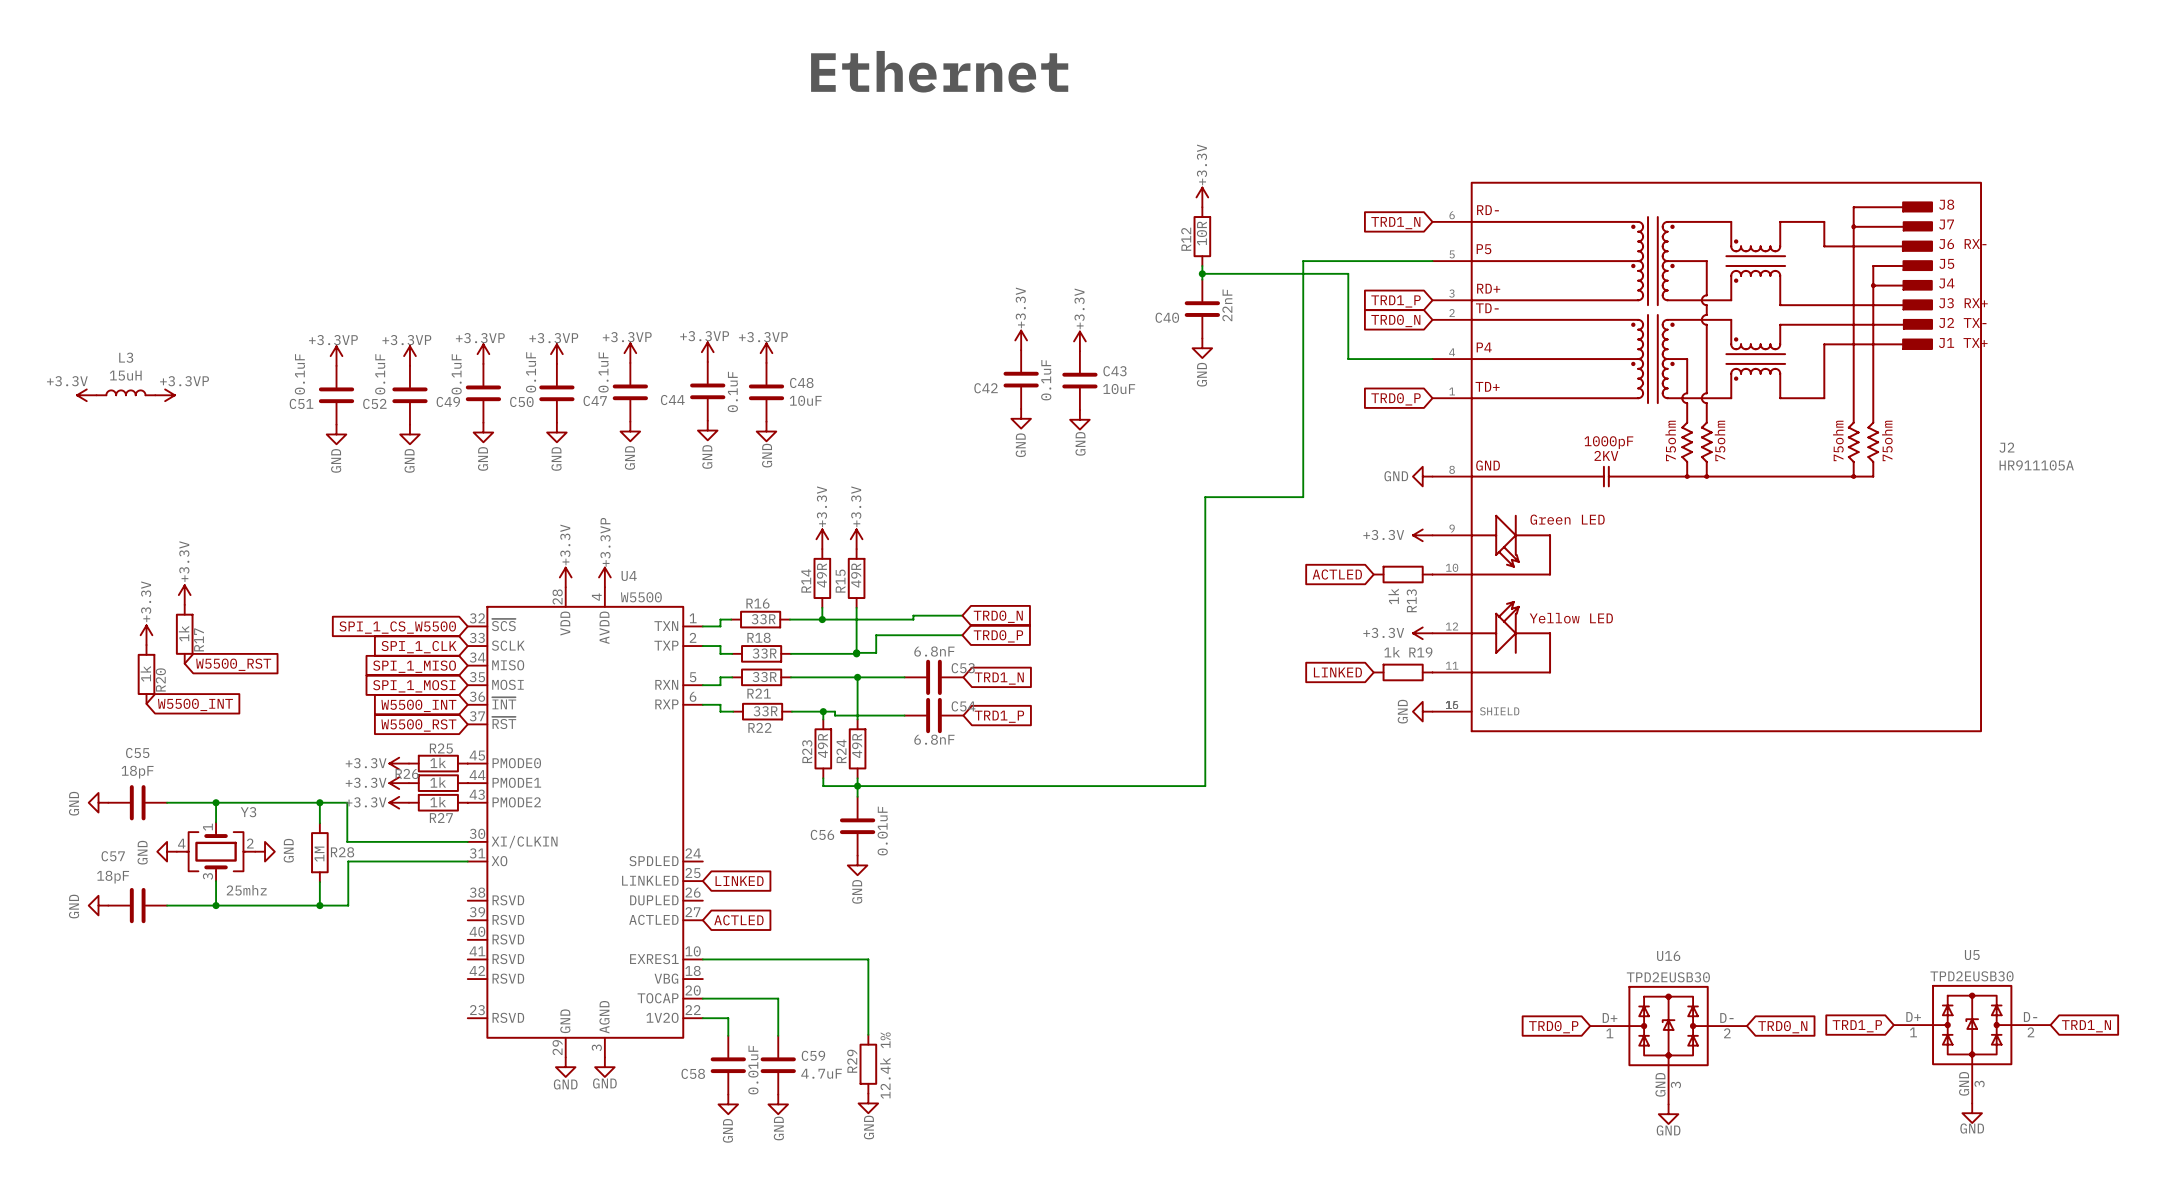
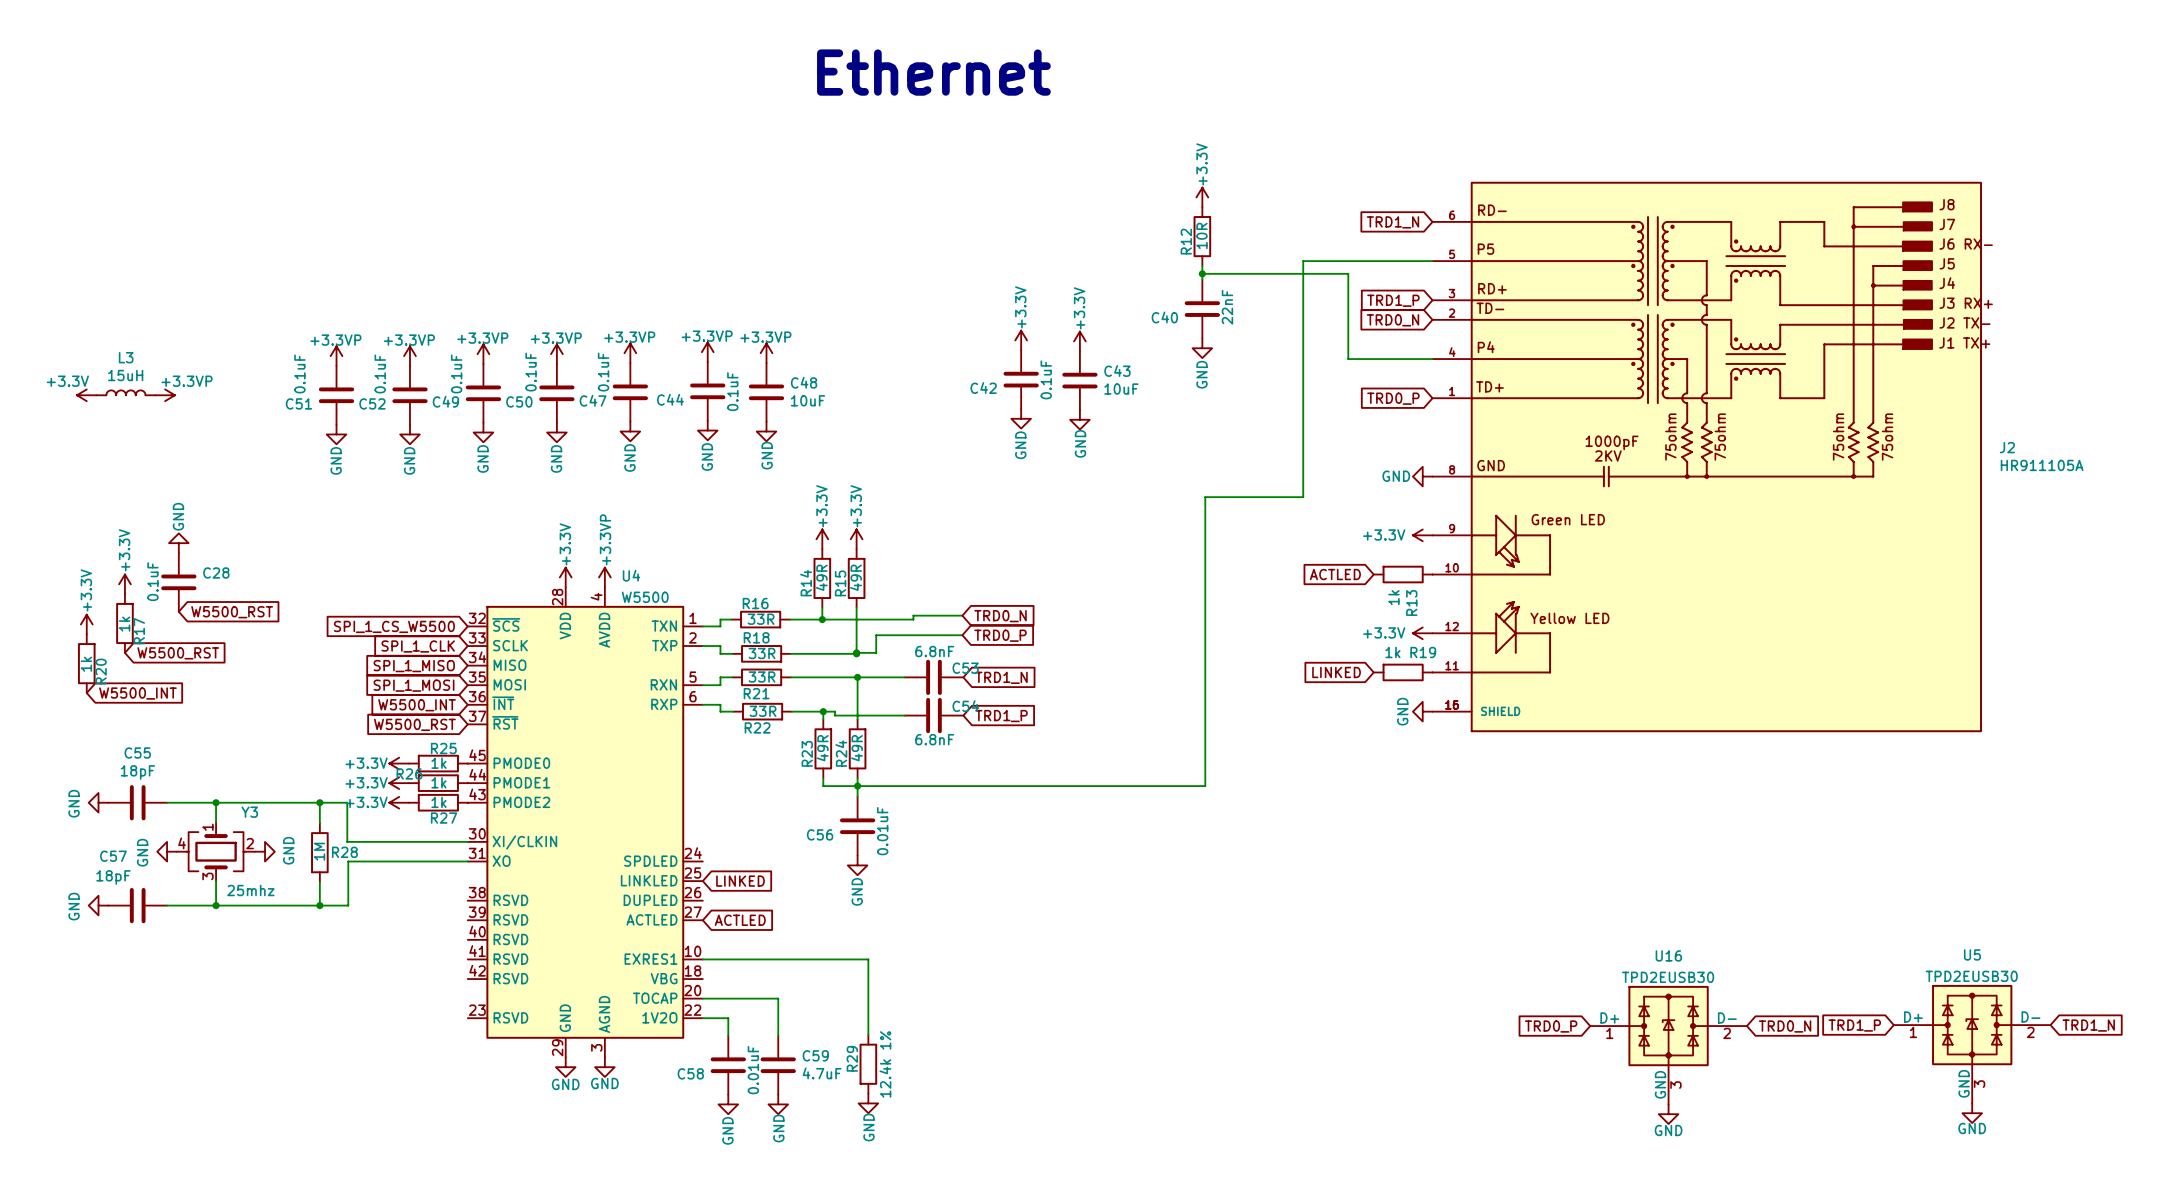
power symbol: none -> GND (178, 543)
C28: none -> 0.1uF (178, 582)
power symbol: none -> +3.3V (124, 584)
power symbol: +3.3V (184, 595) -> none
global label: none -> W5500_RST (232, 612)
power symbol: none -> +3.3V (86, 624)
R17 position: (184, 634) -> (124, 623)
power symbol: +3.3V (146, 635) -> none
global label position: W5500_RST (233, 664) -> W5500_RST (178, 653)
R20 position: (146, 674) -> (86, 663)
global label position: W5500_INT (195, 704) -> W5500_INT (137, 693)

